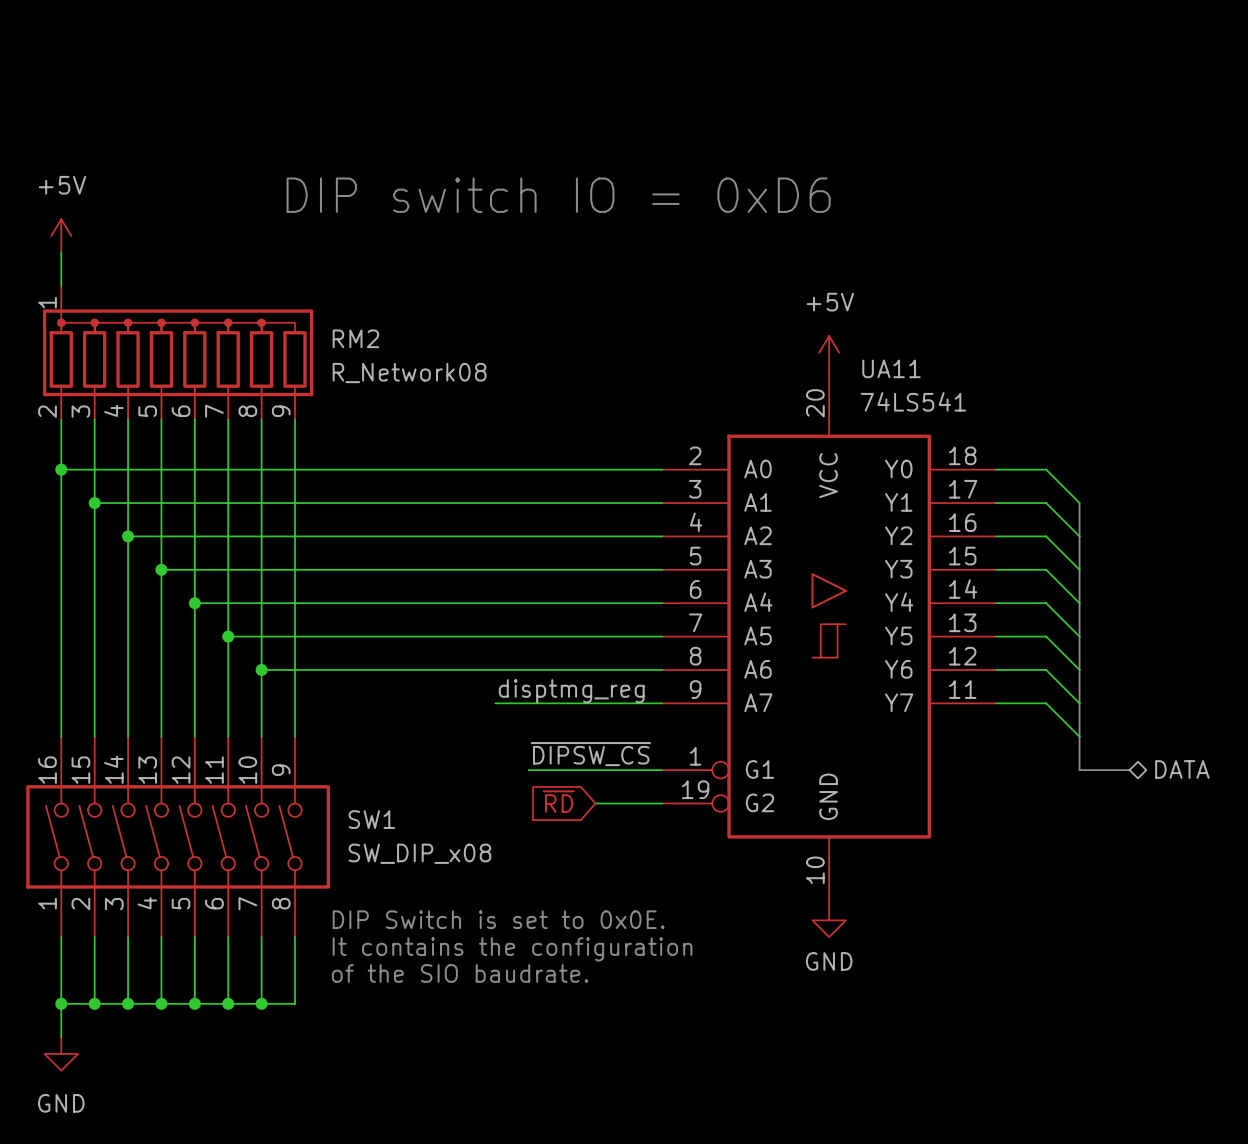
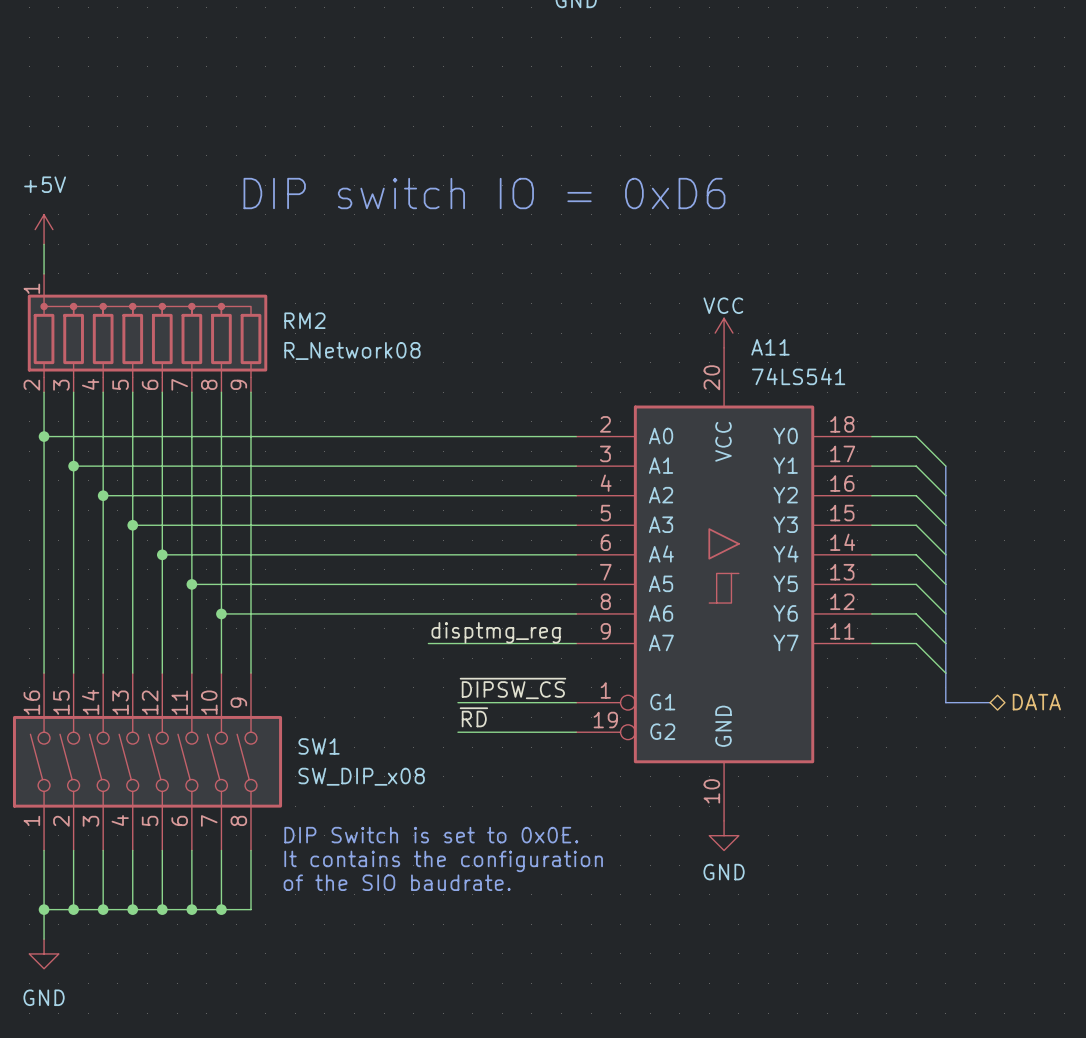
power symbol: +5V (829, 352) -> VCC (724, 333)
UA11 name: UA11 (891, 368) -> A11 (770, 347)
label: none -> ~{RD} (473, 717)
global label: ~{RD} (558, 801) -> none
wire: none -> (457, 732) (517, 732)

